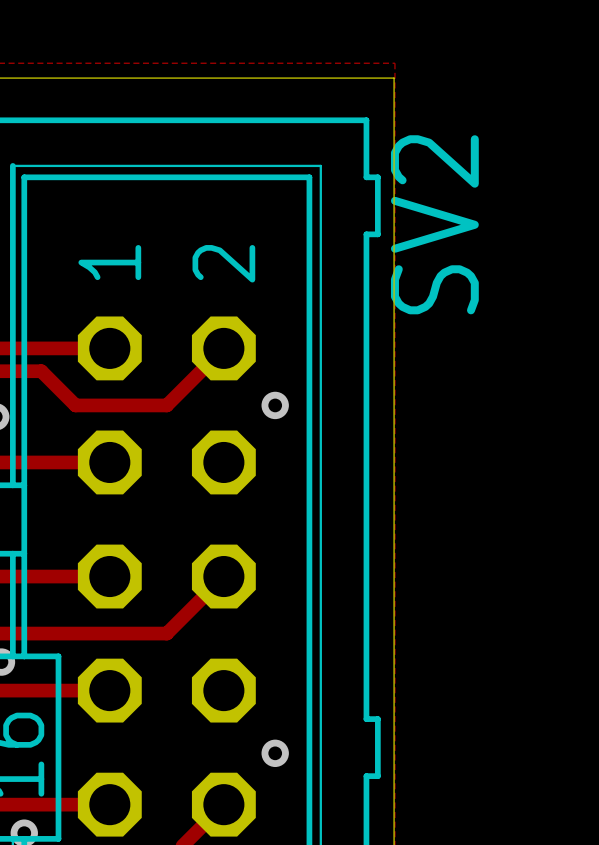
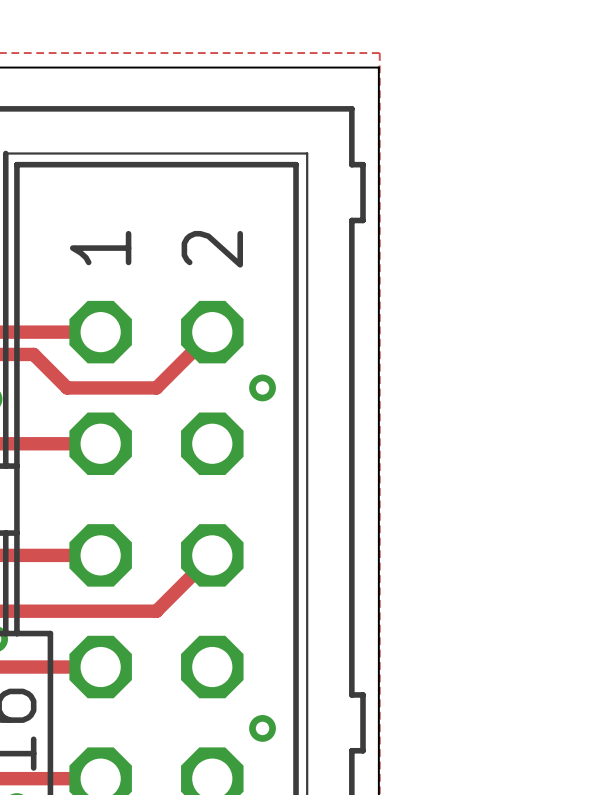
SV2 name: SV2 (434, 224) -> none

